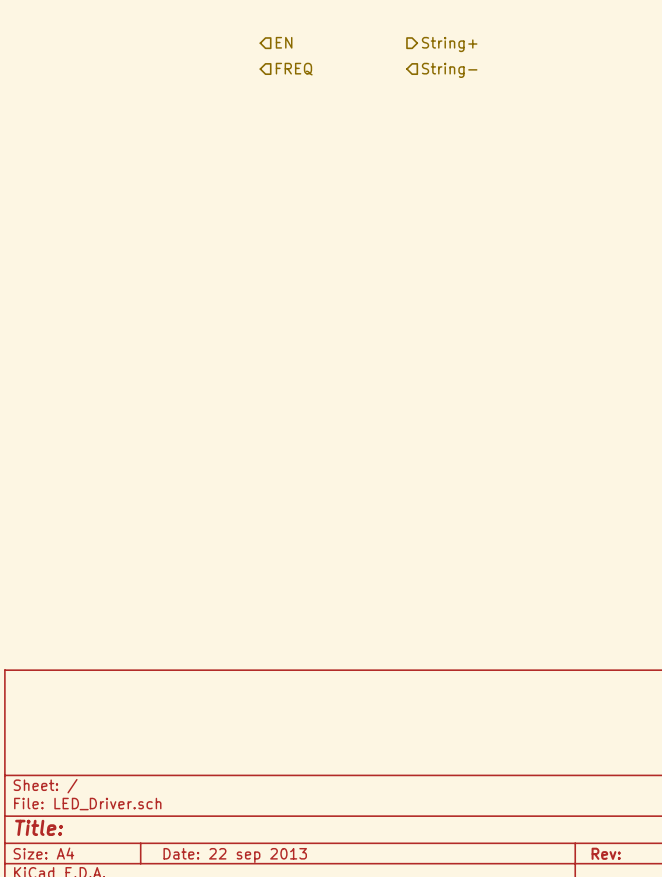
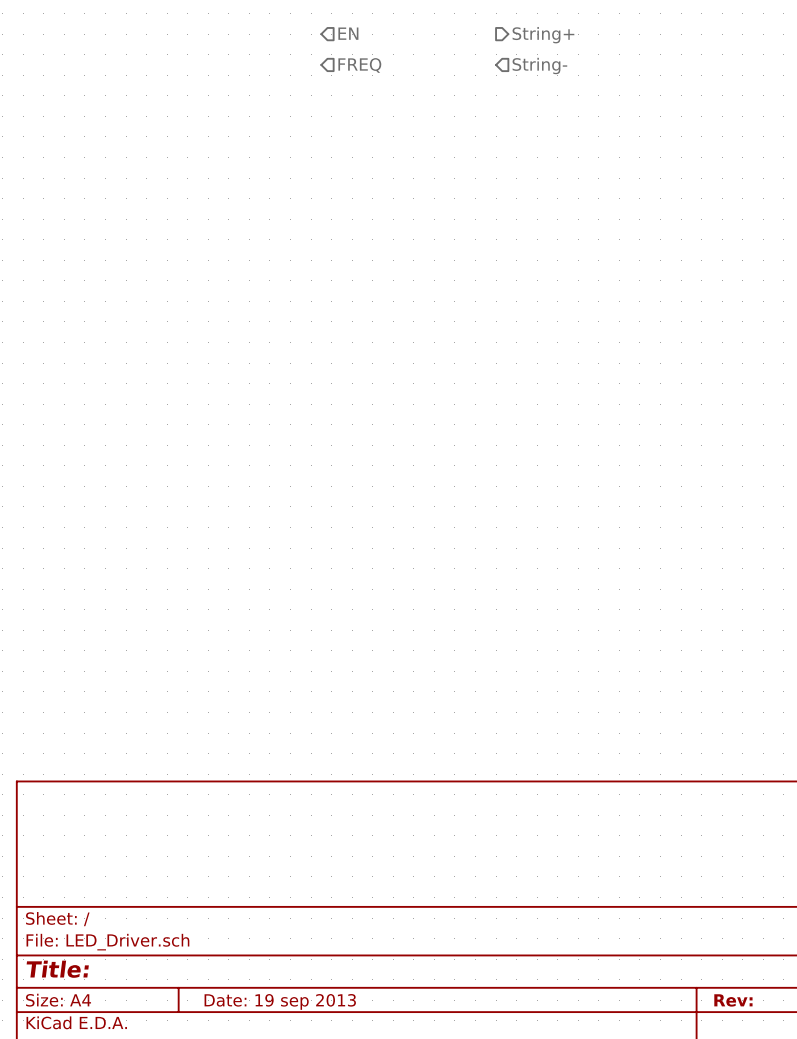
title block: Date: 22 sep 2013 (235, 855) -> Date: 19 sep 2013 (280, 1001)

